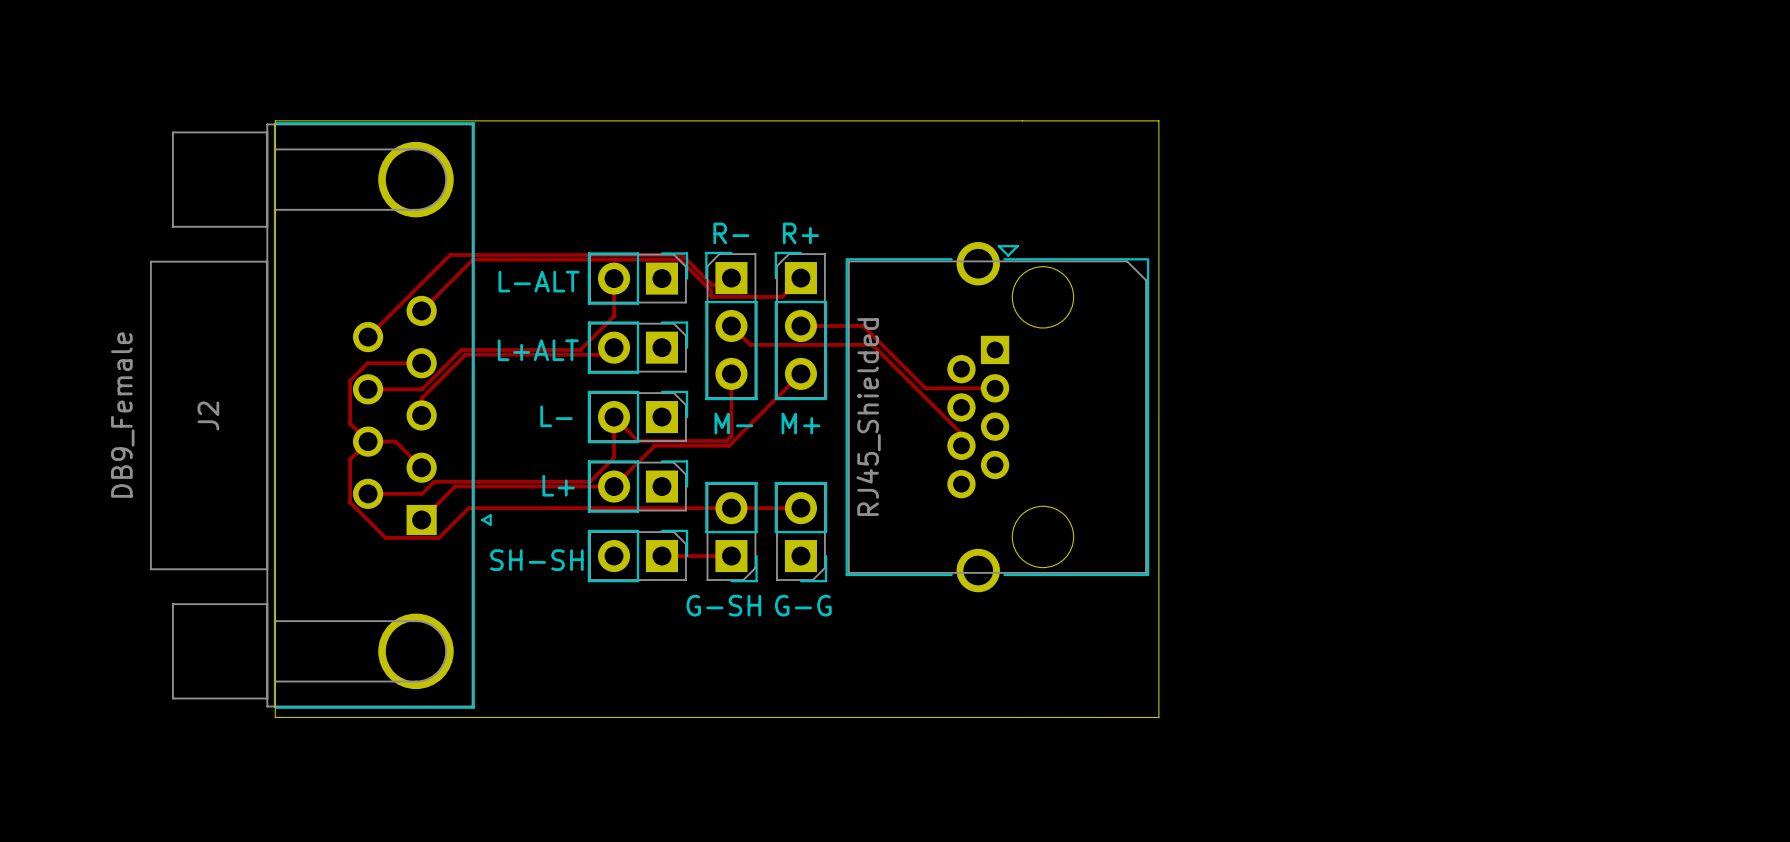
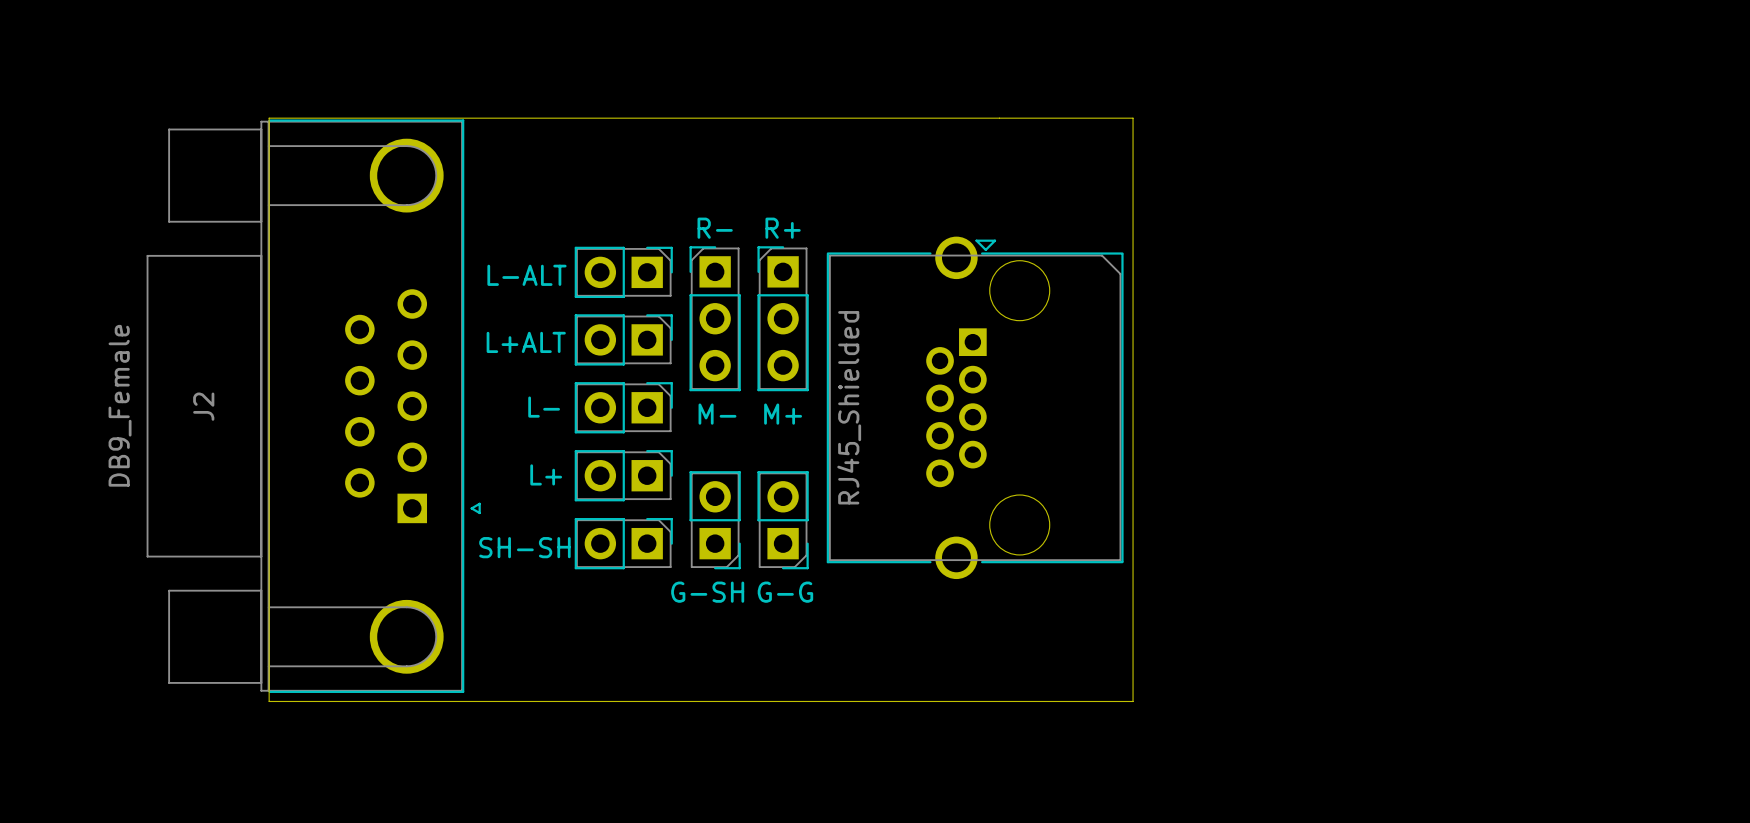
track: (614, 278) (614, 316) (580, 349) (461, 349) (422, 389) (368, 389) -> none
track: (731, 278) (724, 285) (712, 285) (682, 254) (450, 254) (368, 337) -> none
track: (800, 278) (782, 296) (711, 296) (711, 290) (680, 259) (472, 259) (421, 310) -> none
track: (731, 326) (750, 344) (872, 344) (961, 433) (961, 445) -> none
track: (800, 326) (863, 326) (925, 388) (995, 388) -> none
track: (614, 347) (606, 354) (465, 354) (421, 398) (421, 415) -> none
track: (421, 363) (367, 363) (350, 380) (350, 423) (368, 441) -> none
track: (731, 373) (731, 436) (726, 441) (638, 441) (614, 417) (614, 457) (590, 481) (434, 481) (422, 493) (368, 493) -> none
track: (800, 373) (729, 445) (654, 445) (614, 486) (455, 486) (421, 520) -> none
track: (368, 441) (395, 441) (421, 467) -> none
track: (368, 441) (350, 459) (350, 502) (385, 537) (439, 537) (468, 508) (800, 508) -> none
track: (661, 556) (731, 556) -> none

